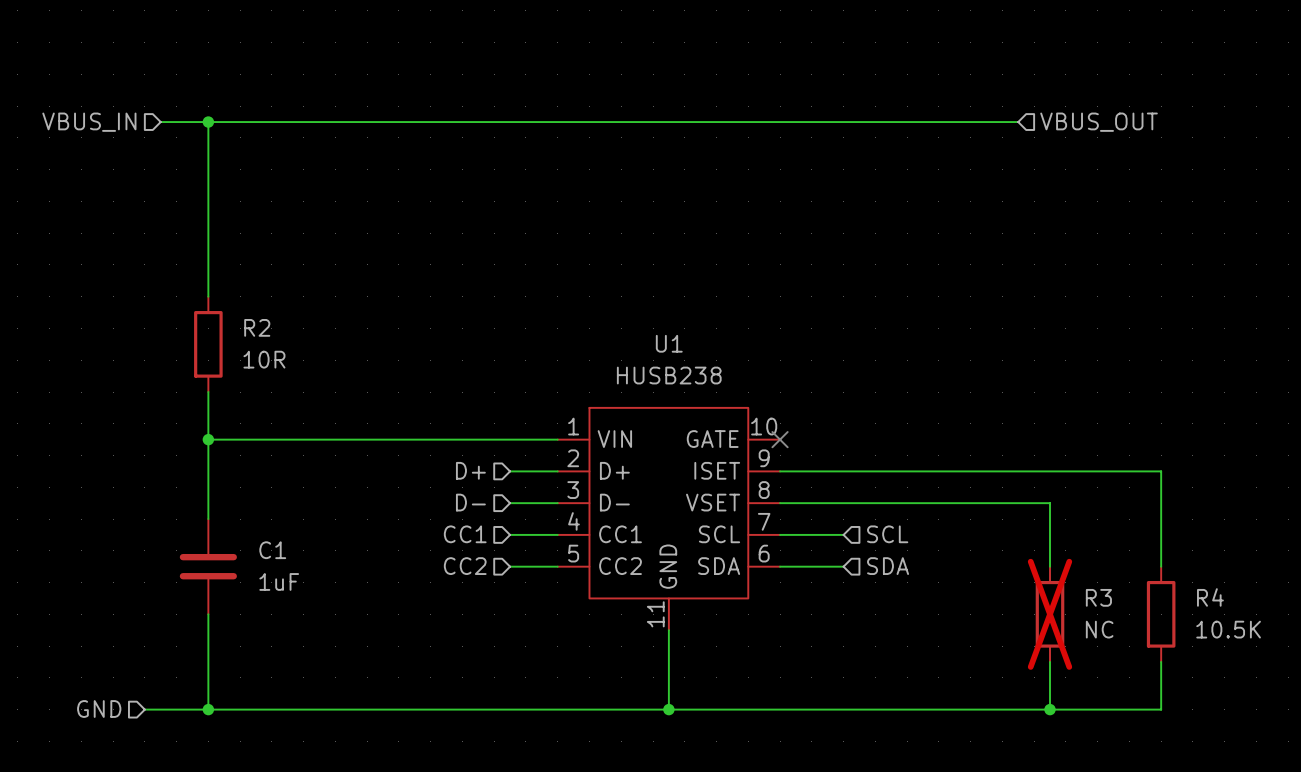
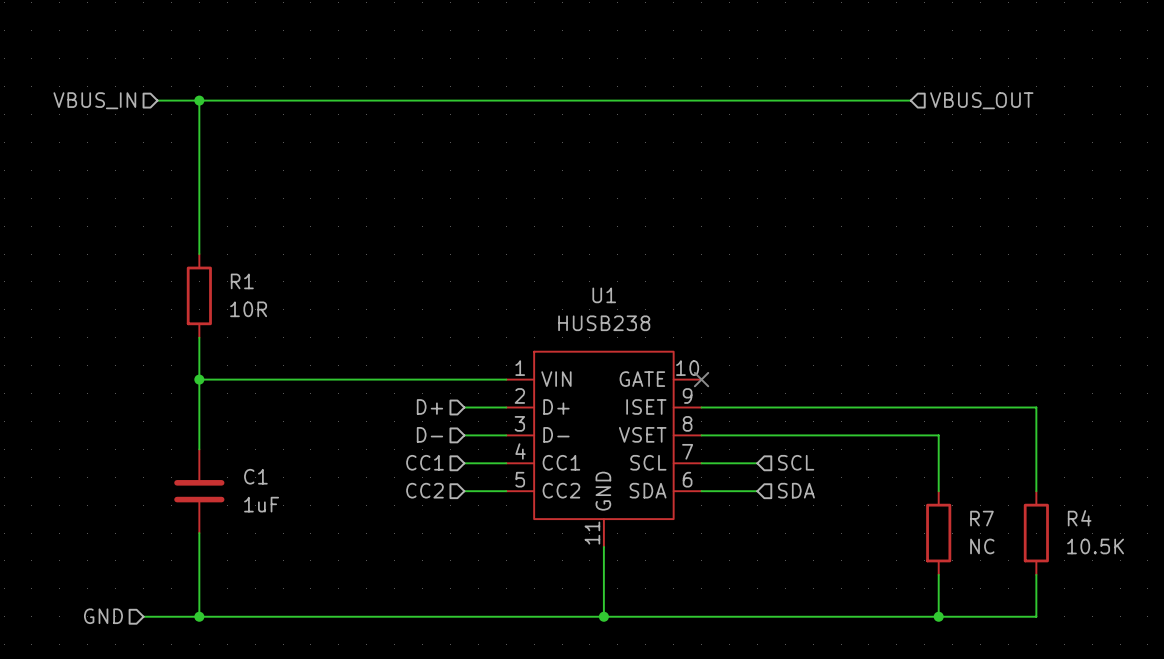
R2 name: R2 (257, 327) -> R1 (242, 281)
R3 name: R3 (1098, 597) -> R7 (981, 518)
R3 do-not-place cross: (1050, 614) -> none

